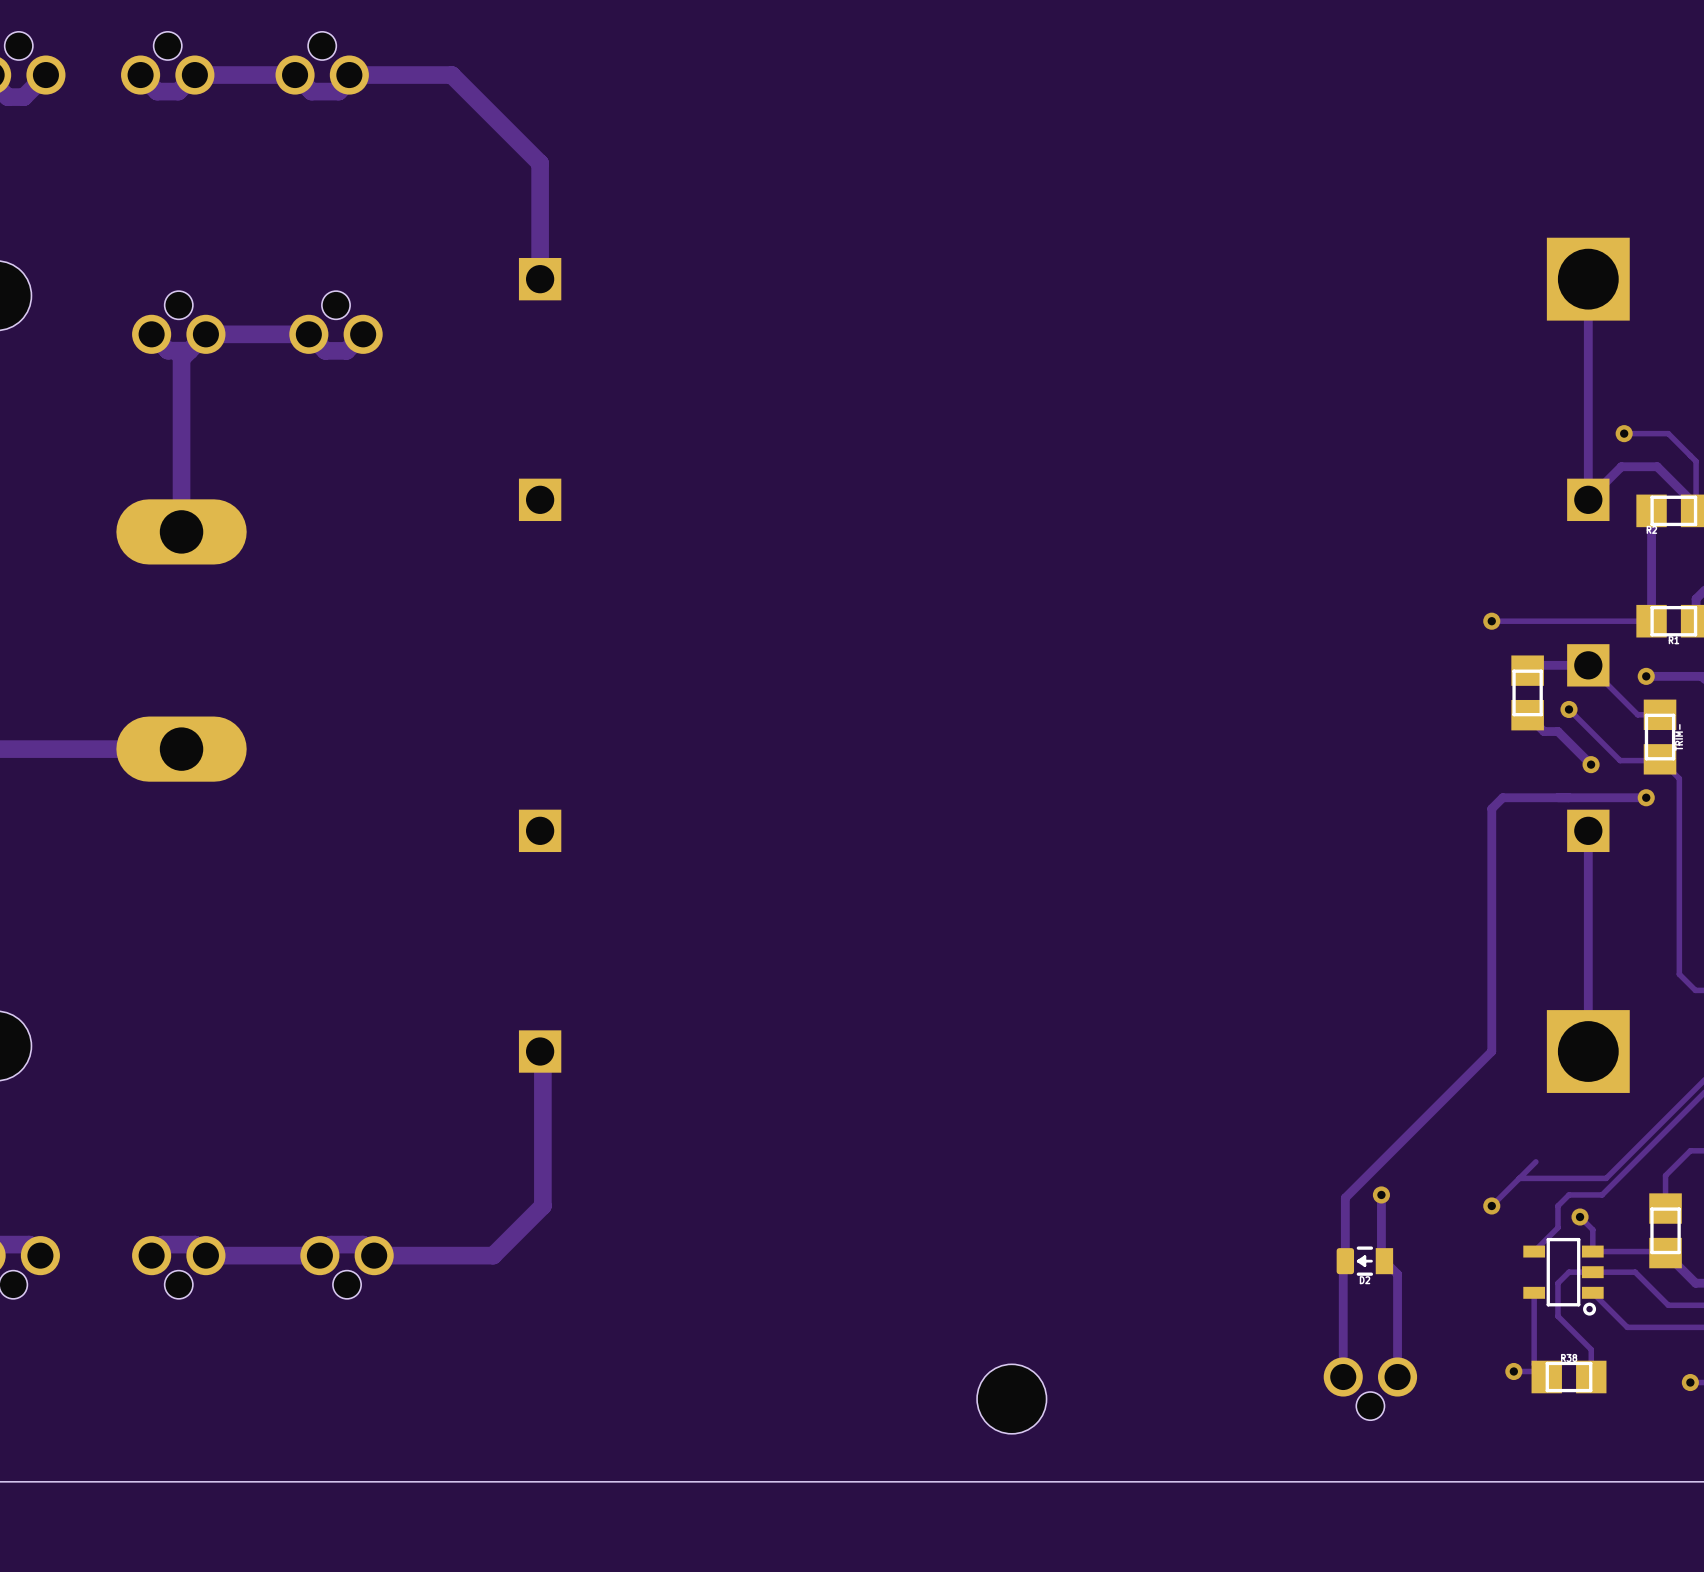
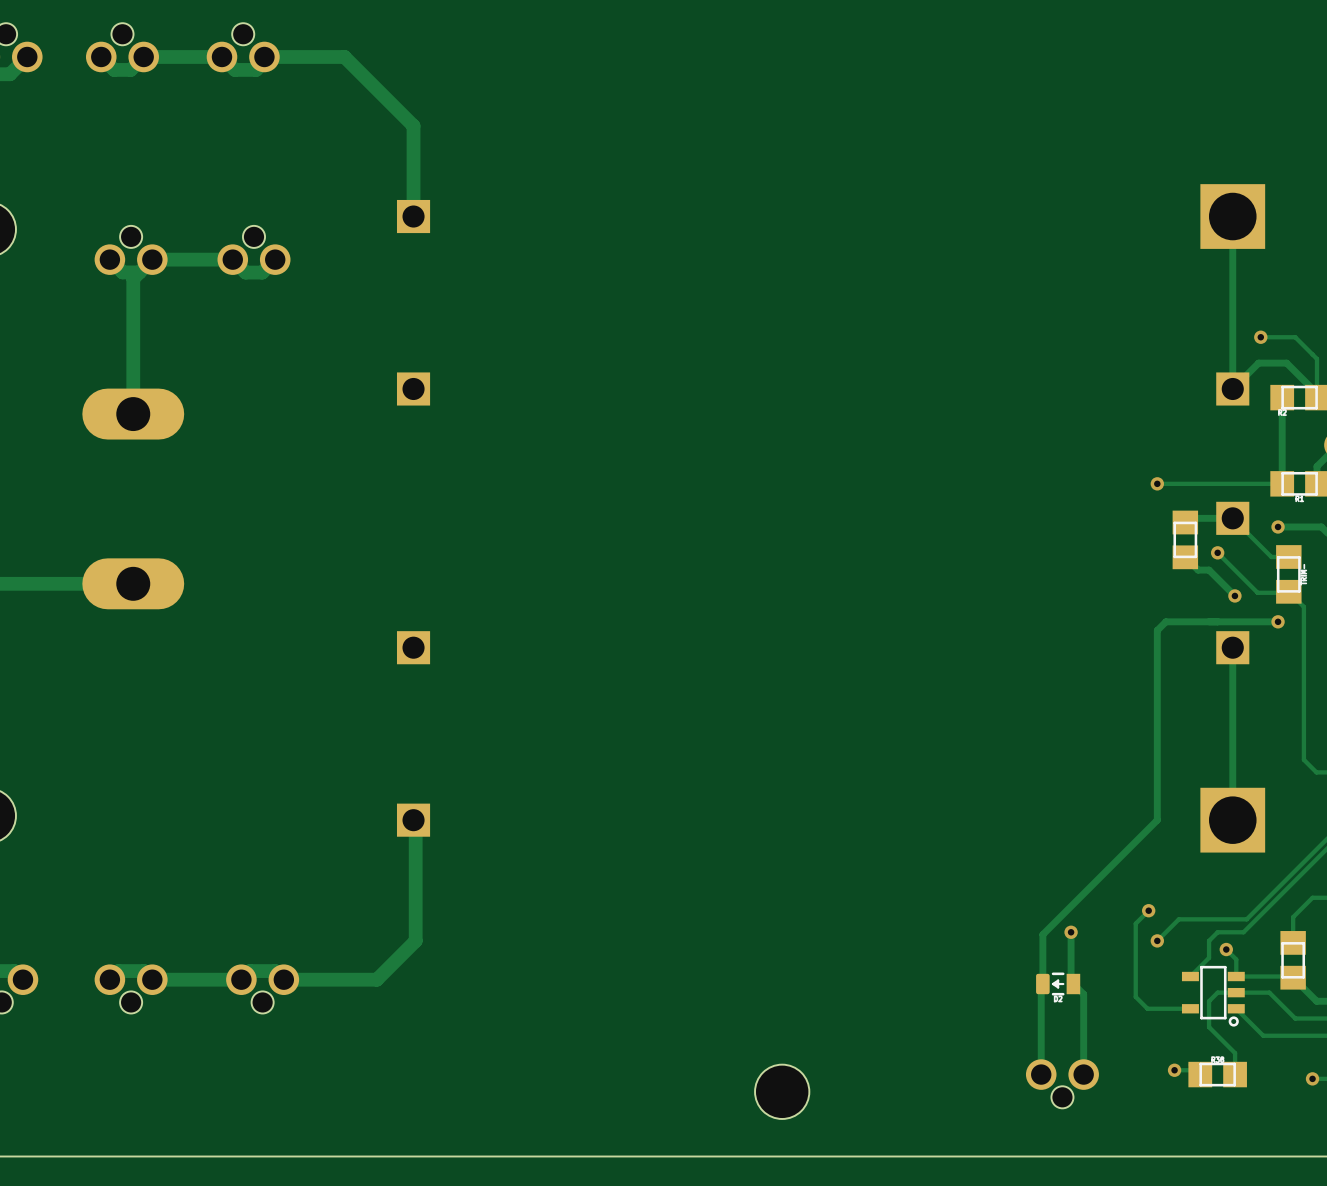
track: (1535, 1161) (1519, 1178) -> none
via: none -> (1148, 910)
track: (1534, 1292) (1534, 1364) -> (1190, 1008) (1147, 1008) (1135, 996) (1135, 923) (1148, 910)

